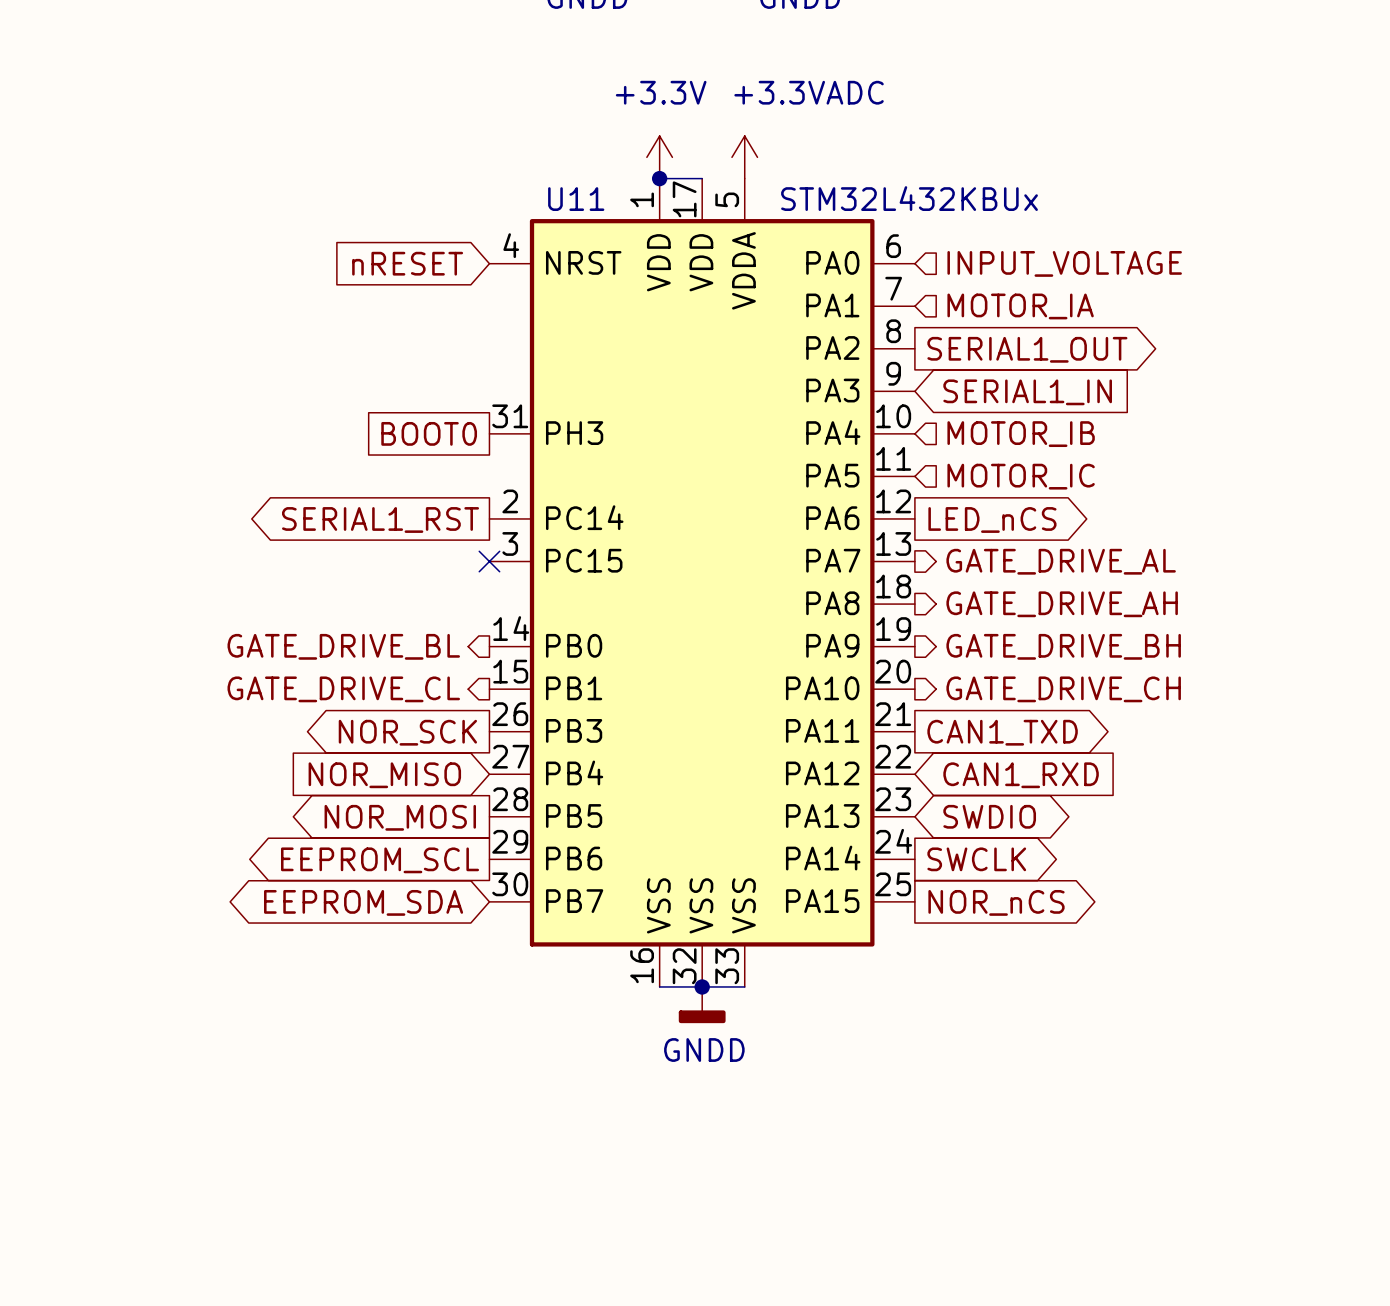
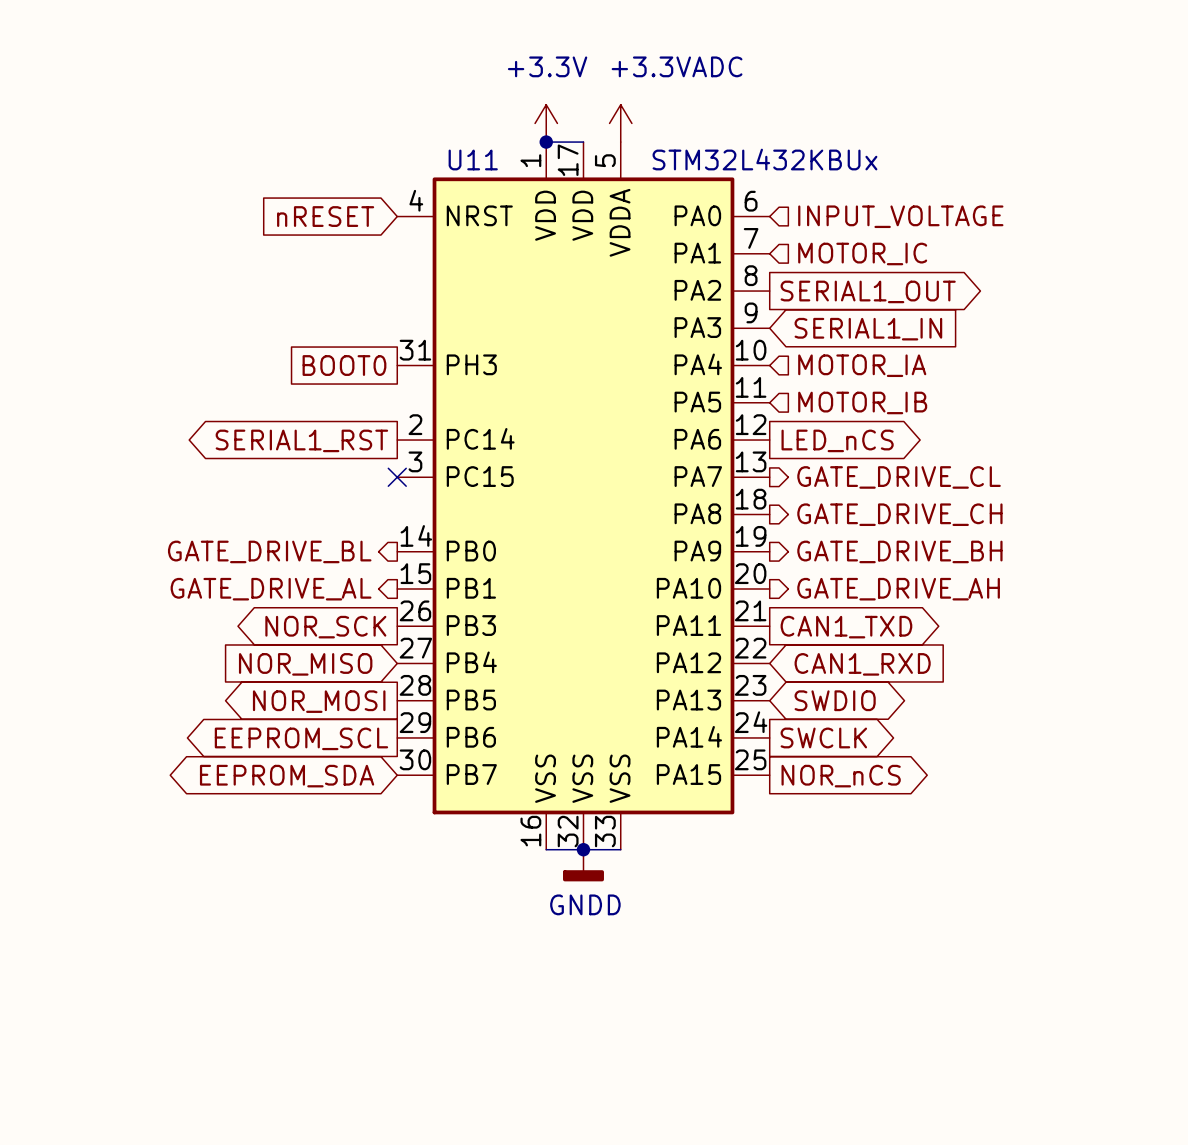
hierarchical label: MOTOR_IA (1020, 306) -> MOTOR_IC (862, 253)
hierarchical label: MOTOR_IB (1021, 434) -> MOTOR_IA (862, 365)
hierarchical label: MOTOR_IC (1021, 476) -> MOTOR_IB (862, 402)
hierarchical label: GATE_DRIVE_AL (1061, 561) -> GATE_DRIVE_CL (899, 477)
hierarchical label: GATE_DRIVE_AH (1062, 604) -> GATE_DRIVE_CH (899, 514)
hierarchical label: GATE_DRIVE_CL (343, 689) -> GATE_DRIVE_AL (271, 589)
hierarchical label: GATE_DRIVE_CH (1063, 689) -> GATE_DRIVE_AH (898, 589)

